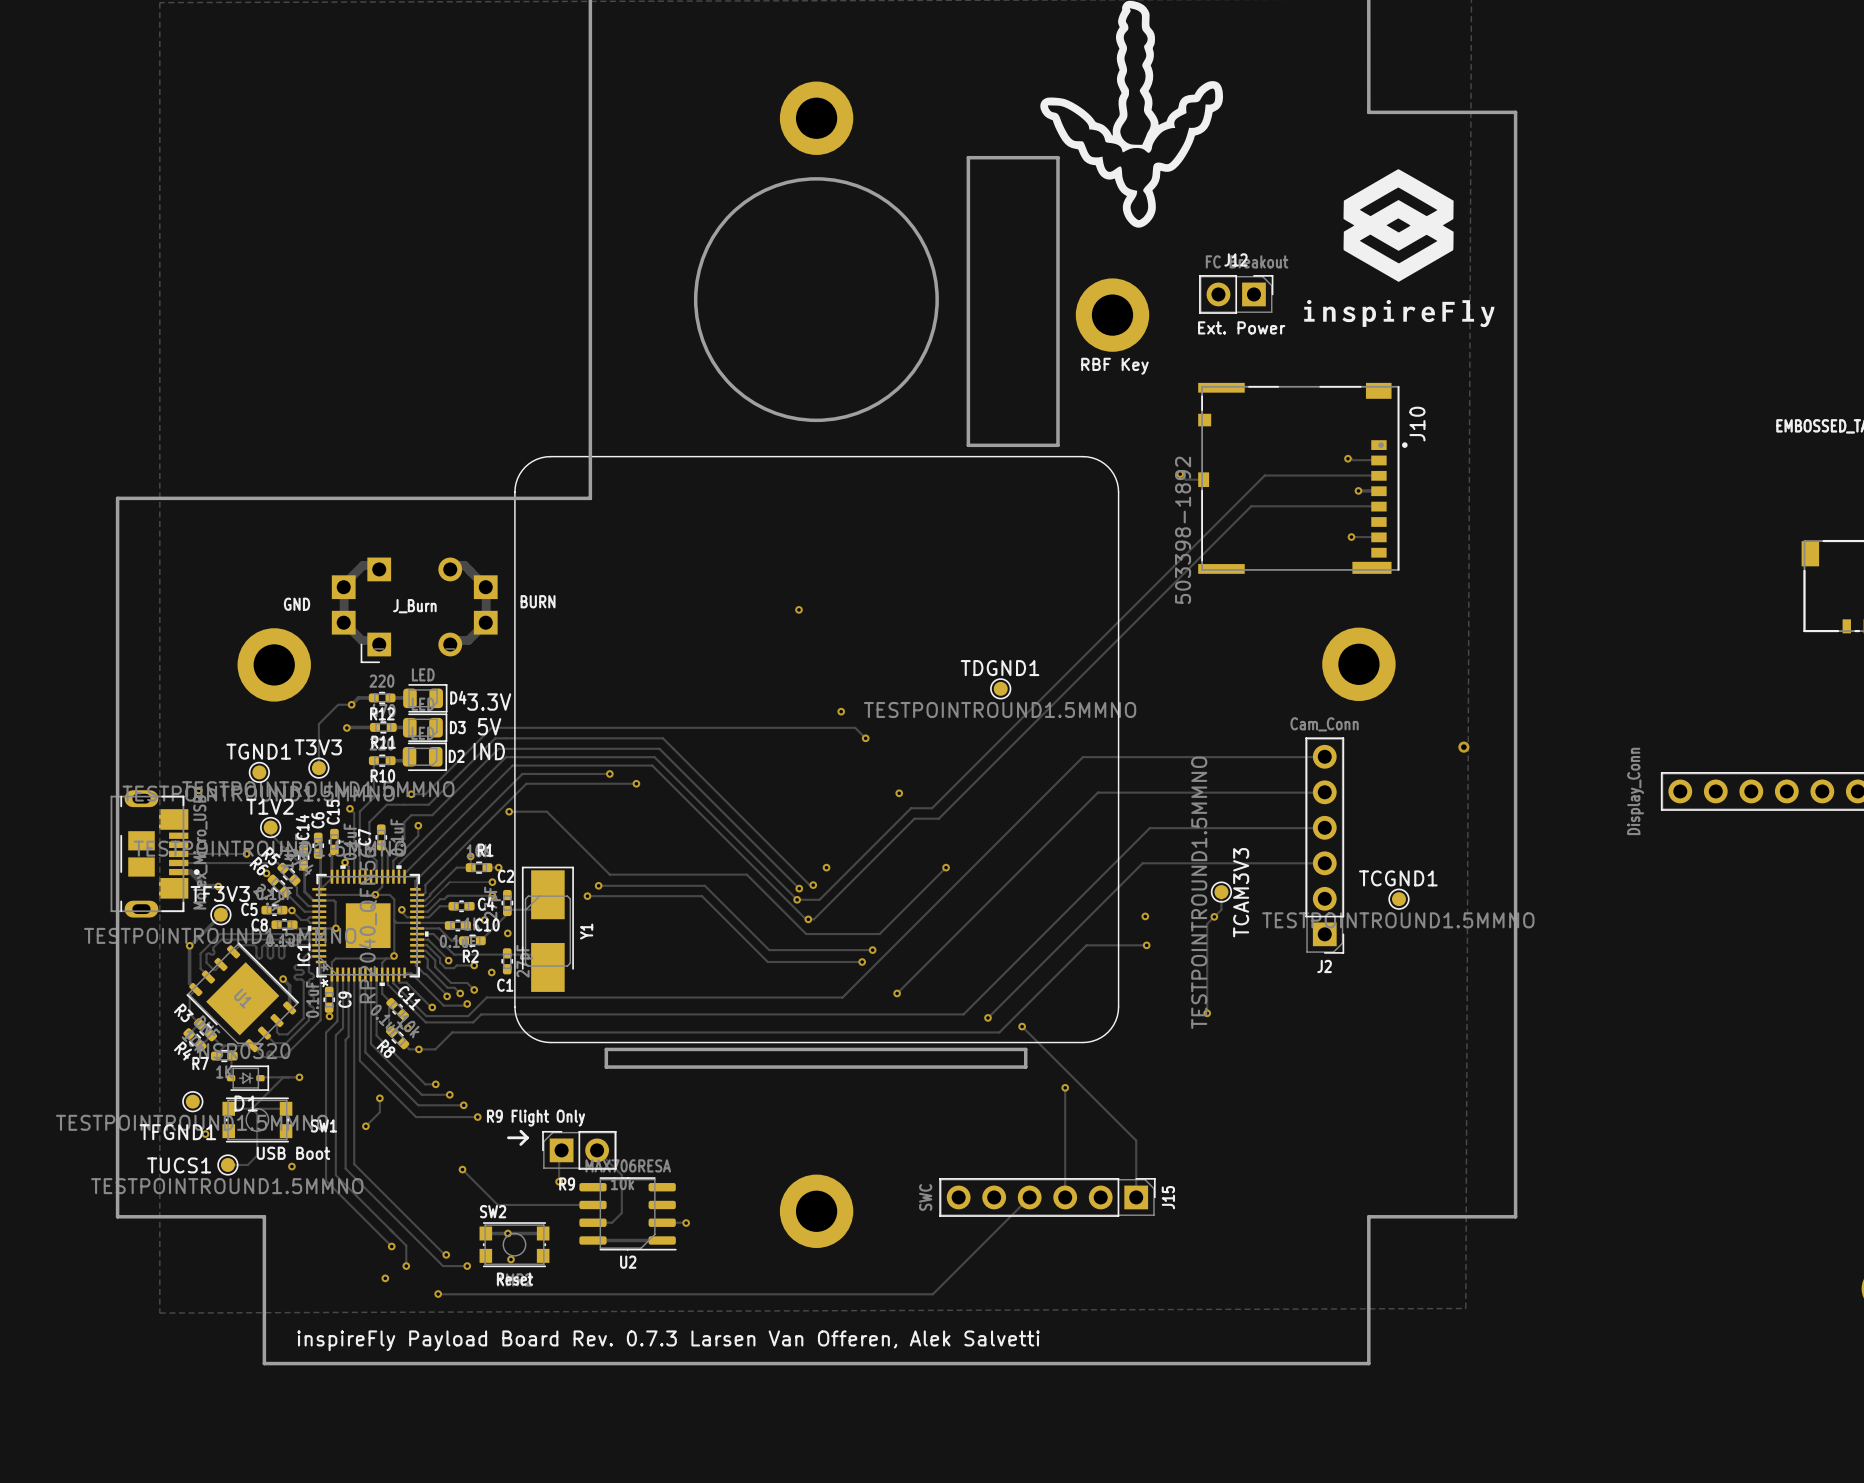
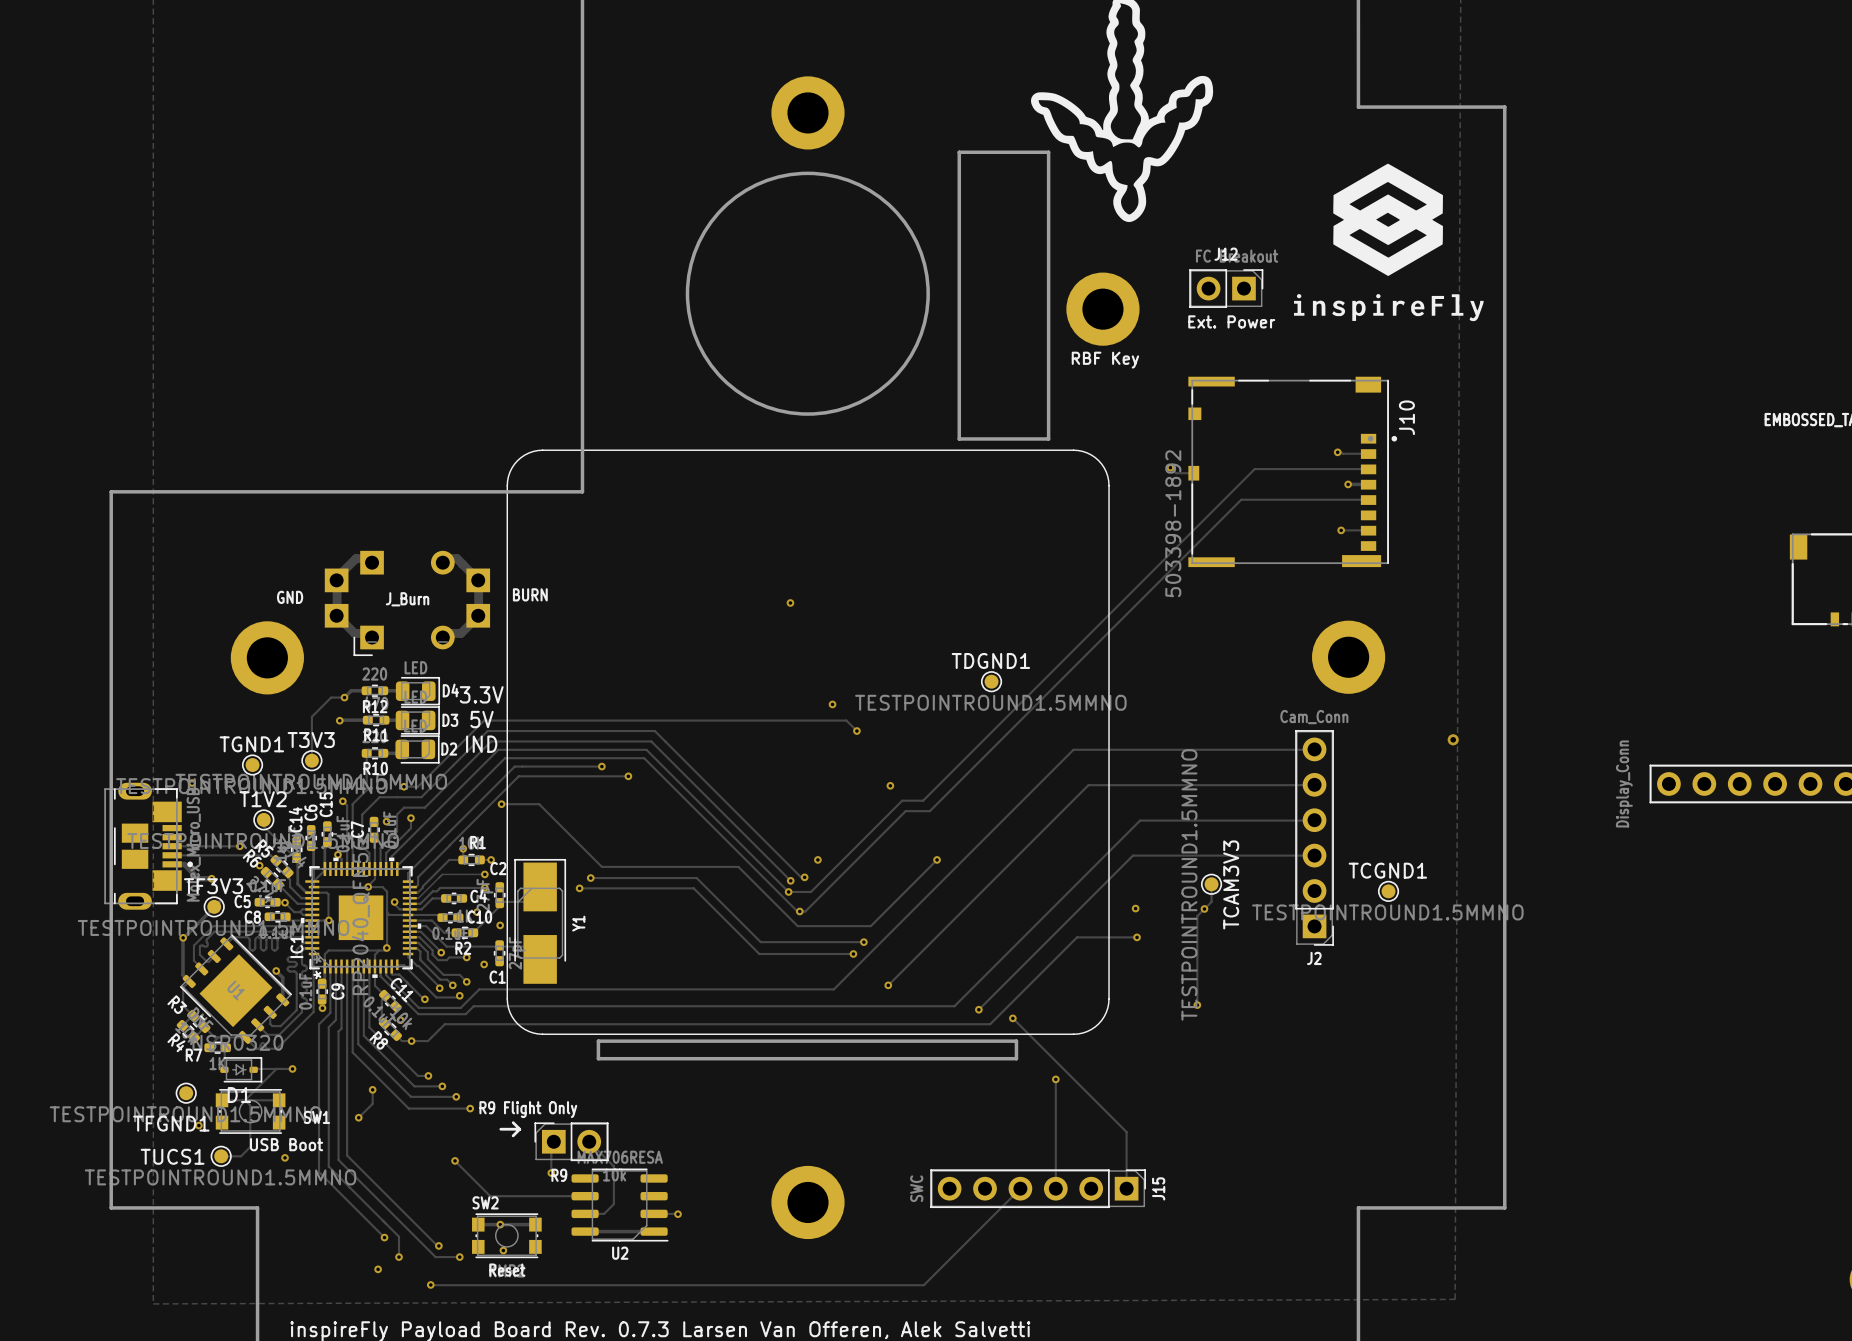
via: none -> (386, 821)

